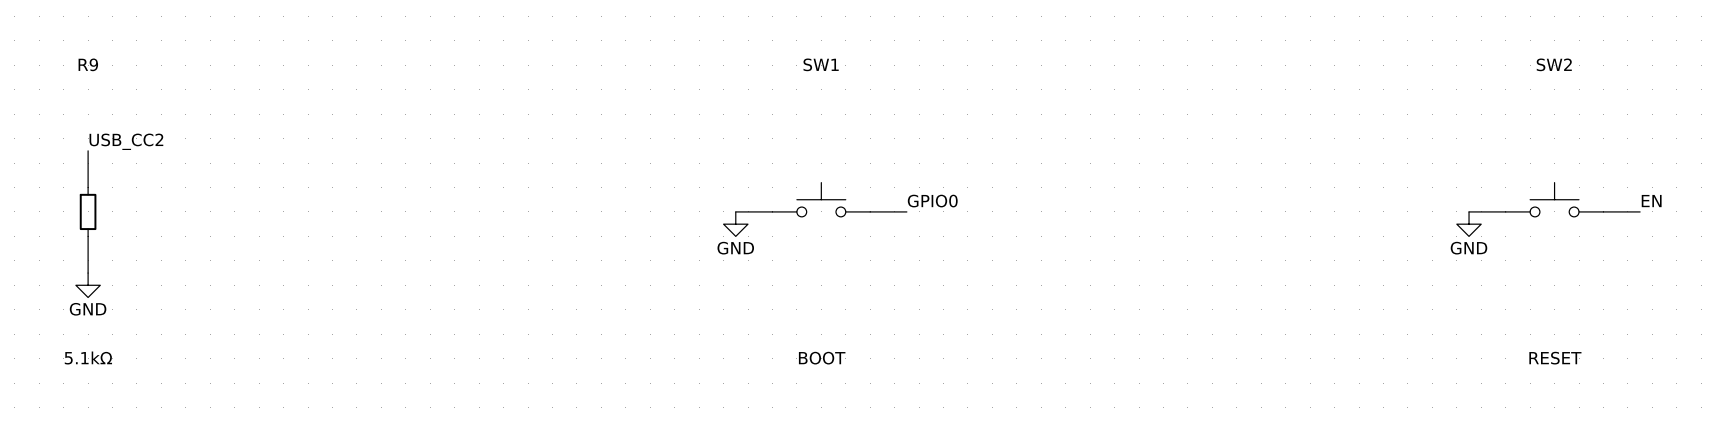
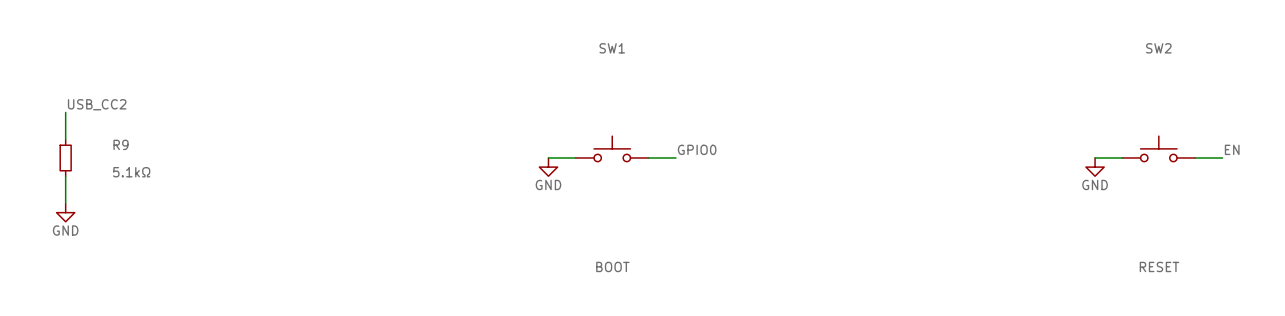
R9 name position: R9 (88, 64) -> R9 (121, 144)
R9 value position: 5.1kΩ (88, 358) -> 5.1kΩ (131, 172)

